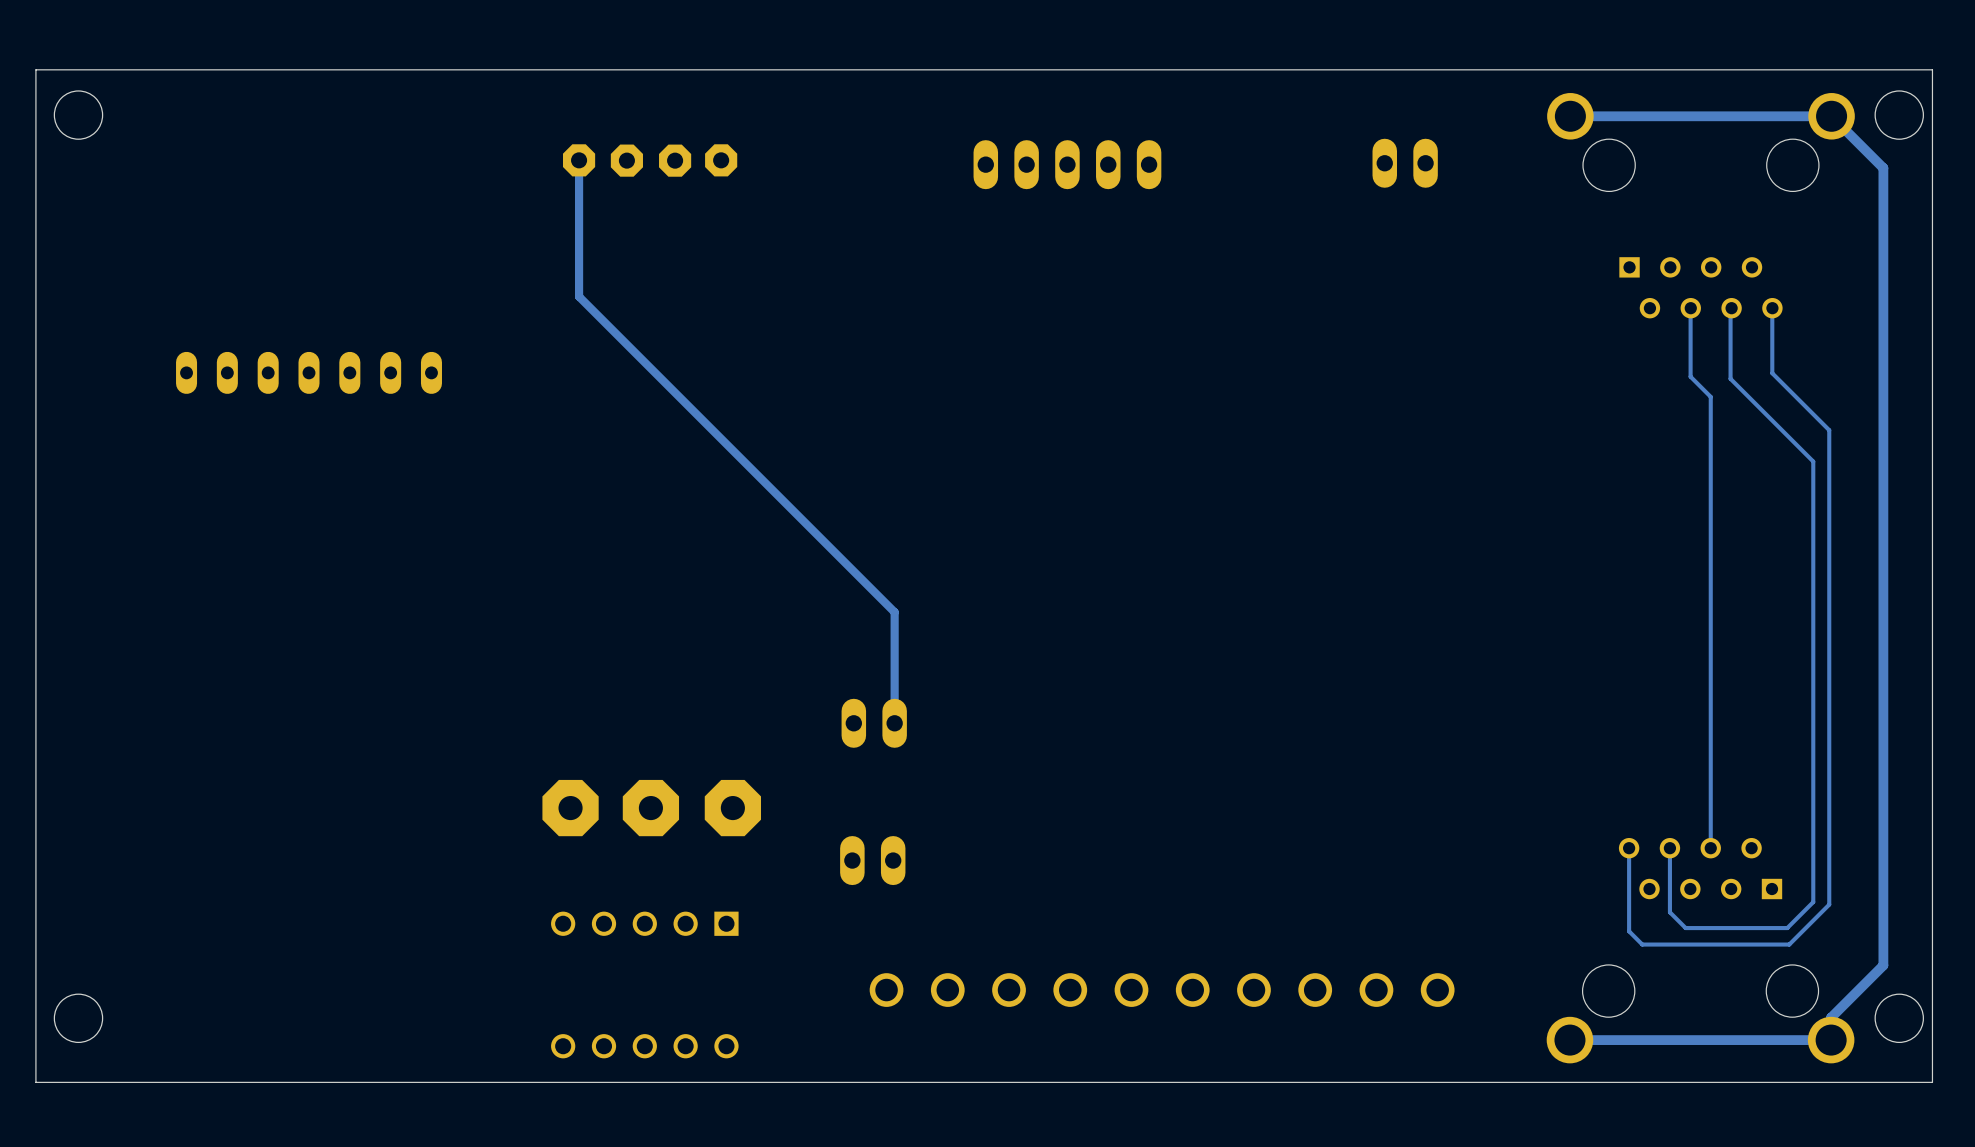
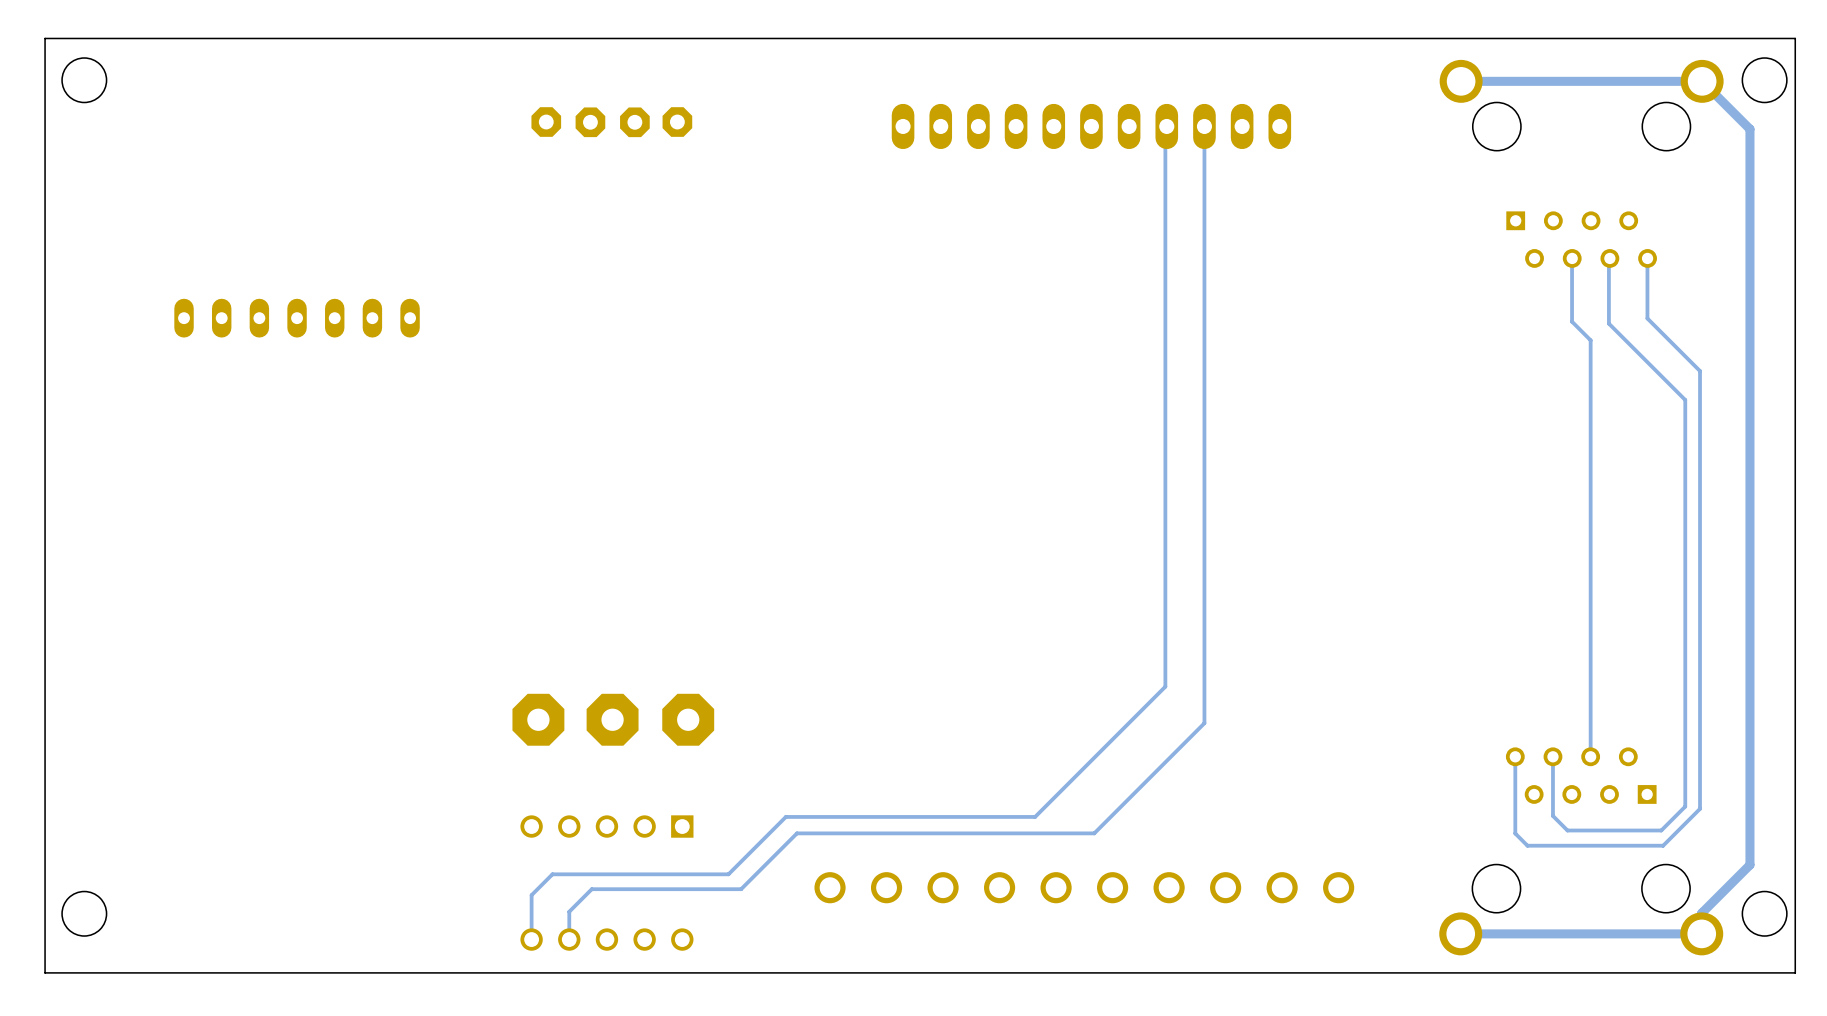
track: (579, 160) (579, 296) (894, 612) (894, 723) -> none
part: (1405, 163) -> none
part: (1067, 164) -> none
part: none -> (1091, 126)
track: none -> (1166, 126) (1165, 686) (1035, 816) (785, 816) (728, 874) (552, 874) (531, 895) (531, 939)
track: none -> (1204, 126) (1204, 723) (1094, 833) (796, 833) (741, 889) (591, 889) (569, 911) (569, 939)
part: (874, 723) -> none
part: (872, 860) -> none

